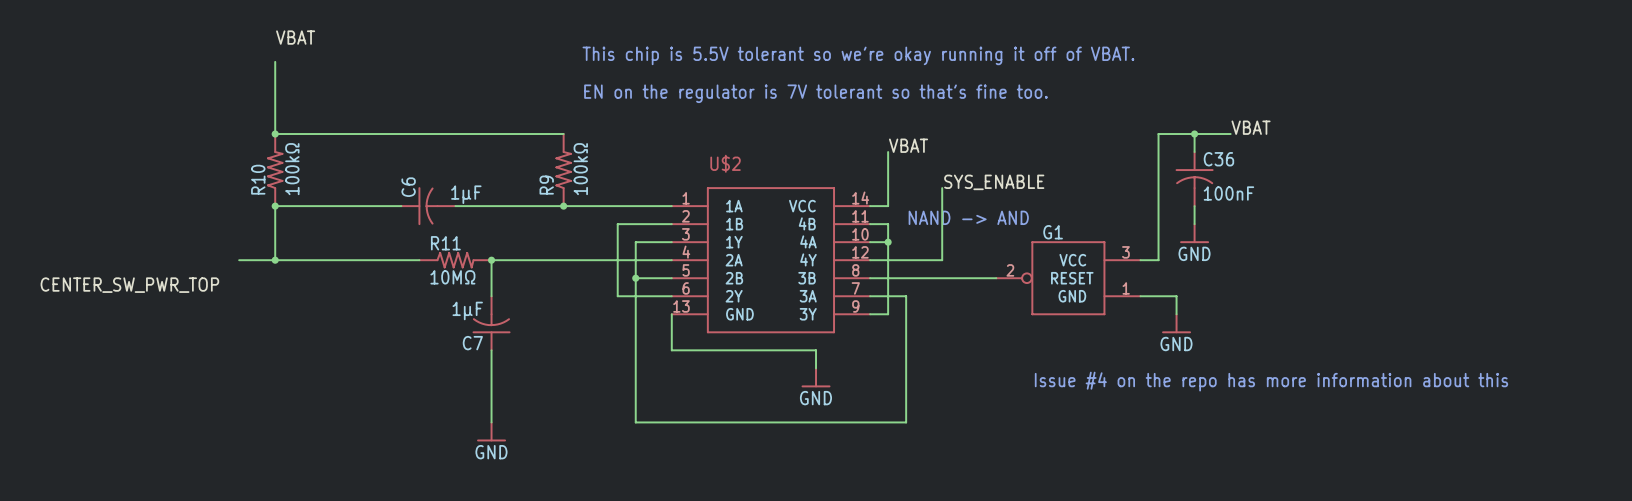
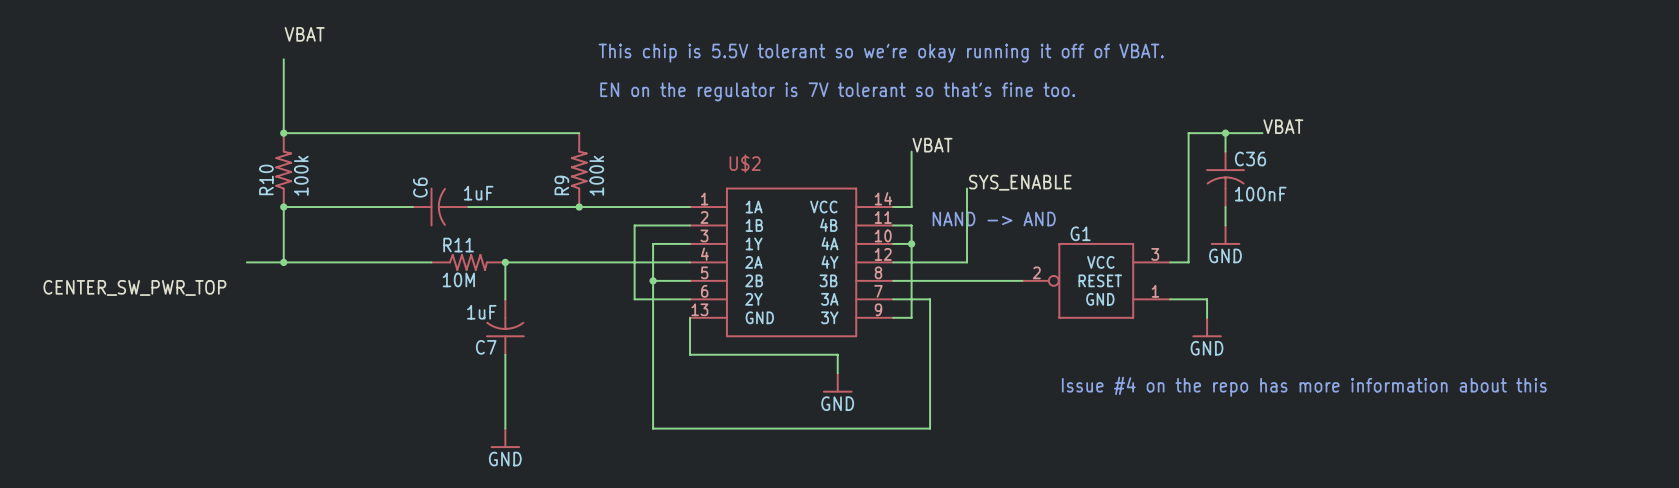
R10 value: 100kΩ (292, 169) -> 100k (301, 175)
R9 value: 100kΩ (580, 169) -> 100k (596, 175)
C6 value: 1μF (466, 194) -> 1uF (478, 193)
R11 value: 10MΩ (452, 277) -> 10M (458, 279)
C7 value: 1μF (467, 310) -> 1uF (481, 312)

